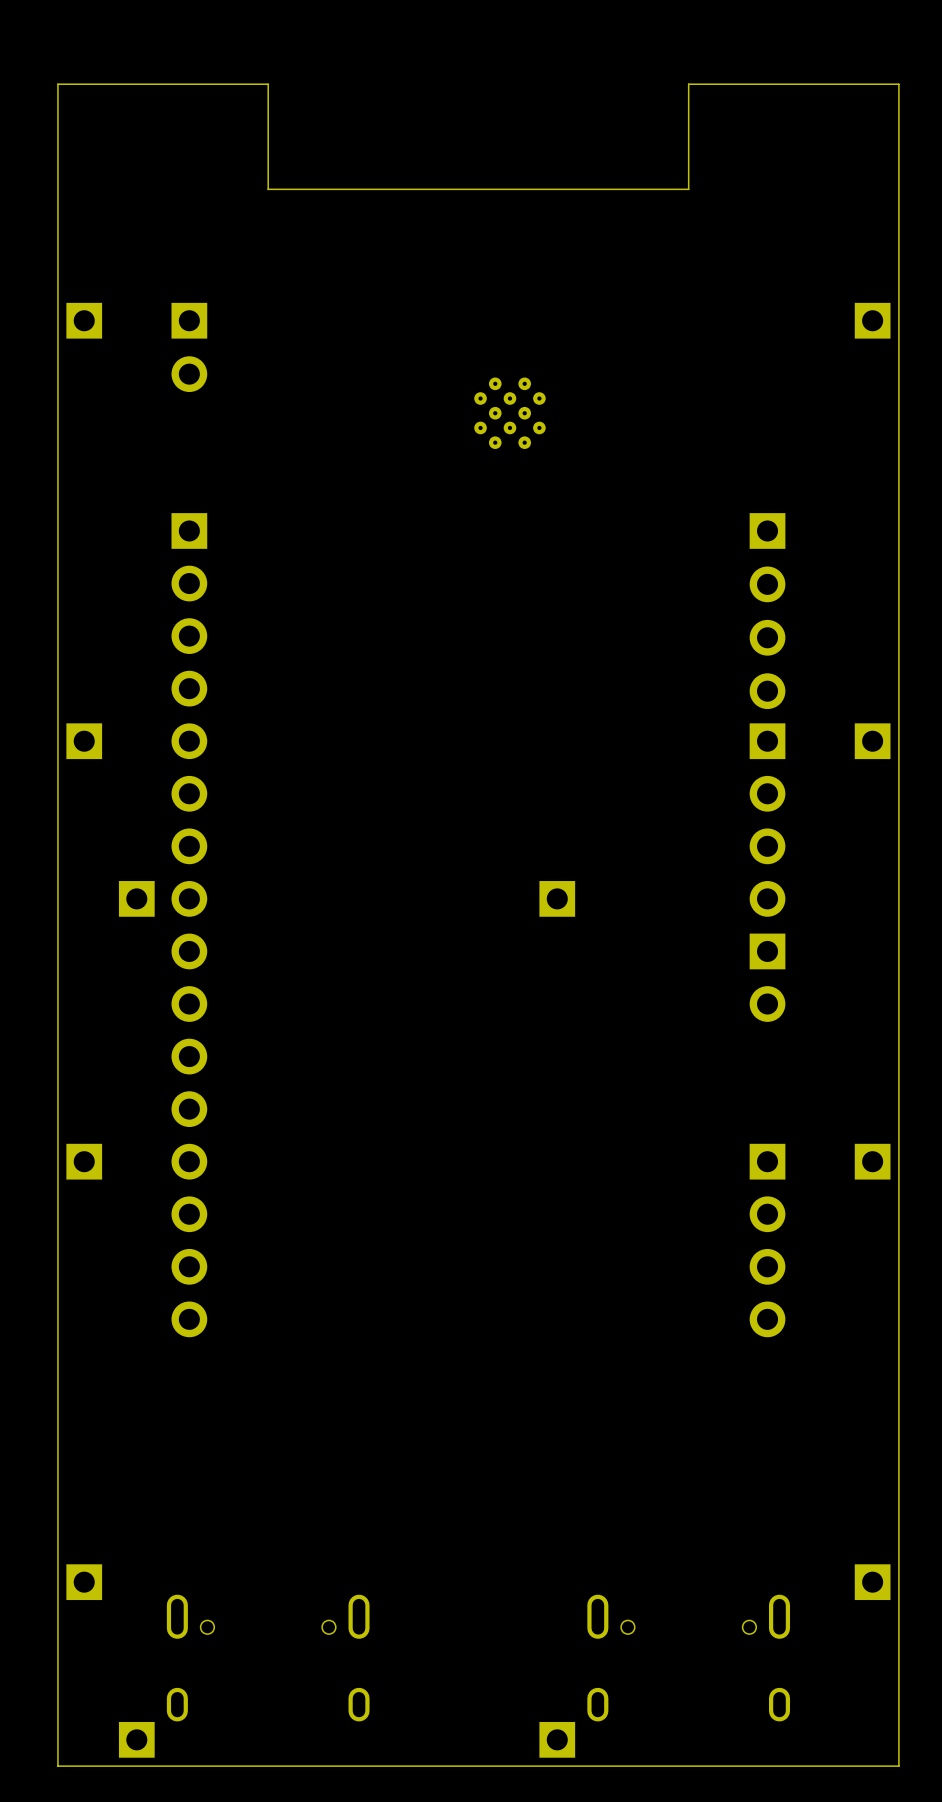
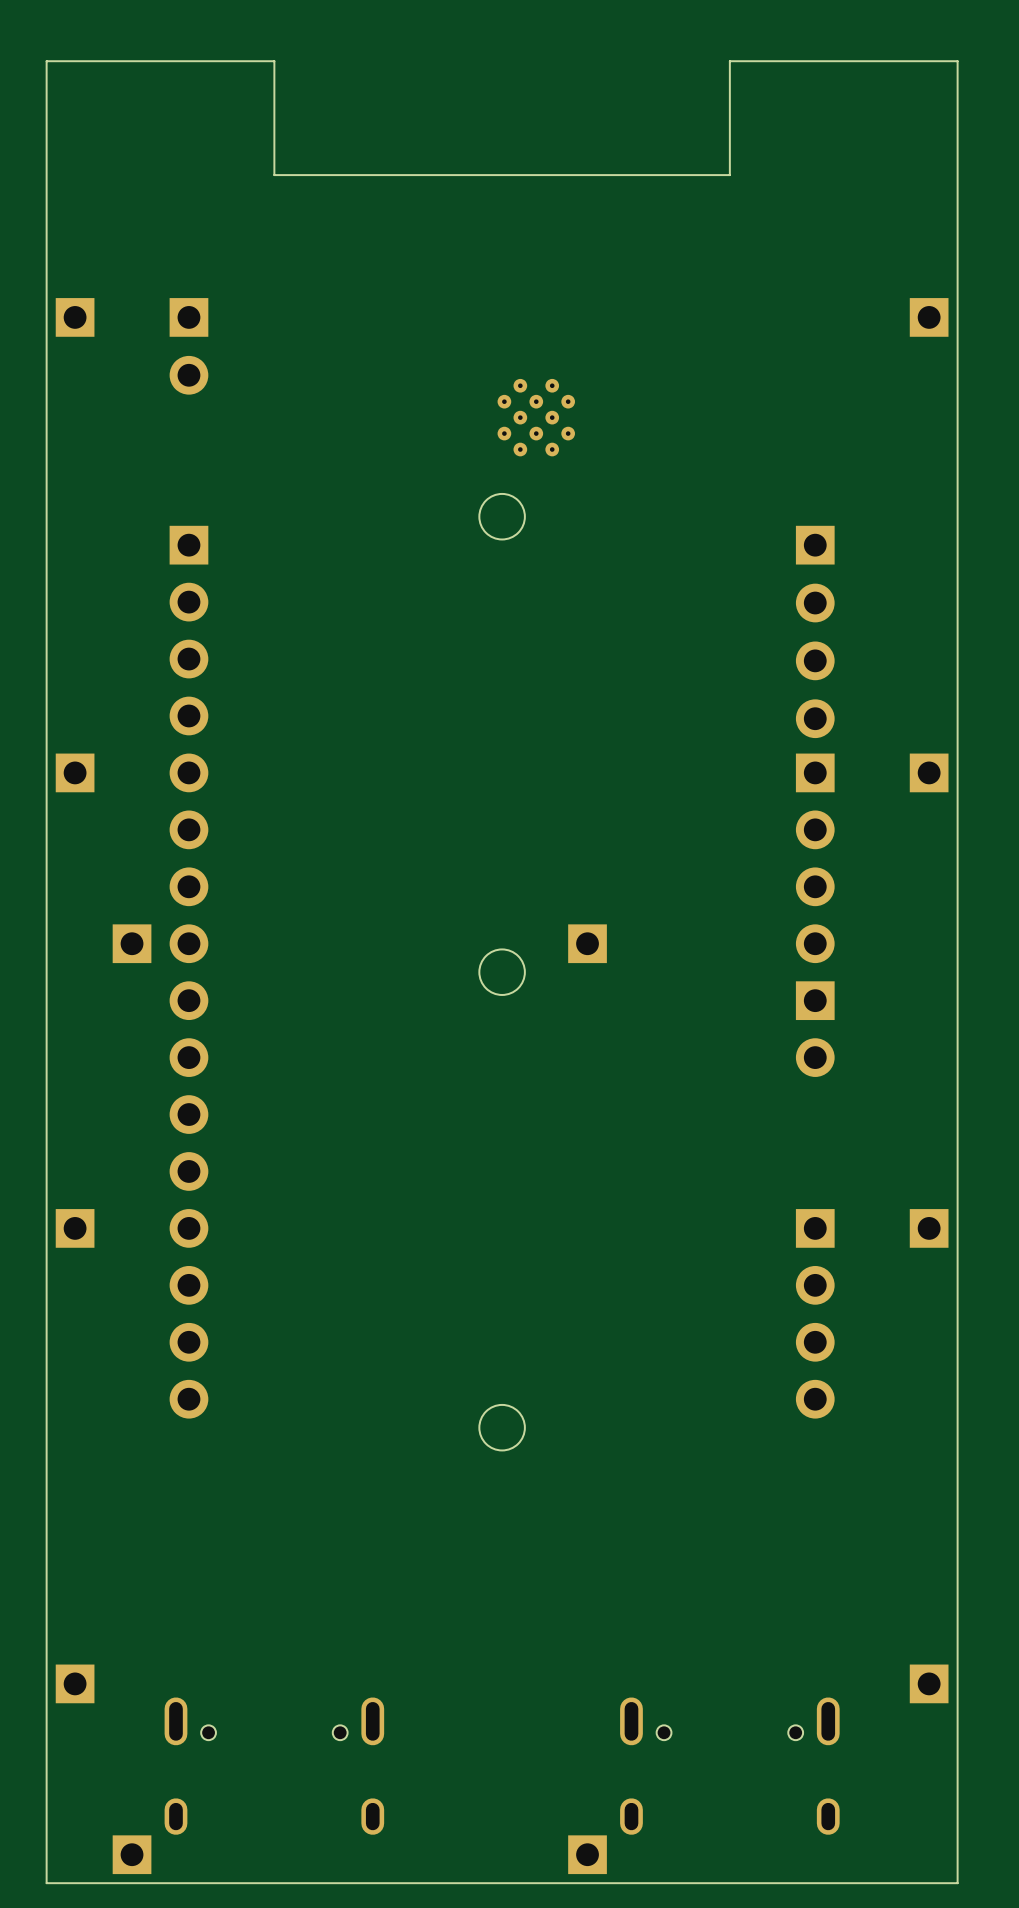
round board edge: none -> [478, 493, 526, 541]
round board edge: none -> [478, 948, 526, 996]
round board edge: none -> [478, 1404, 526, 1452]

